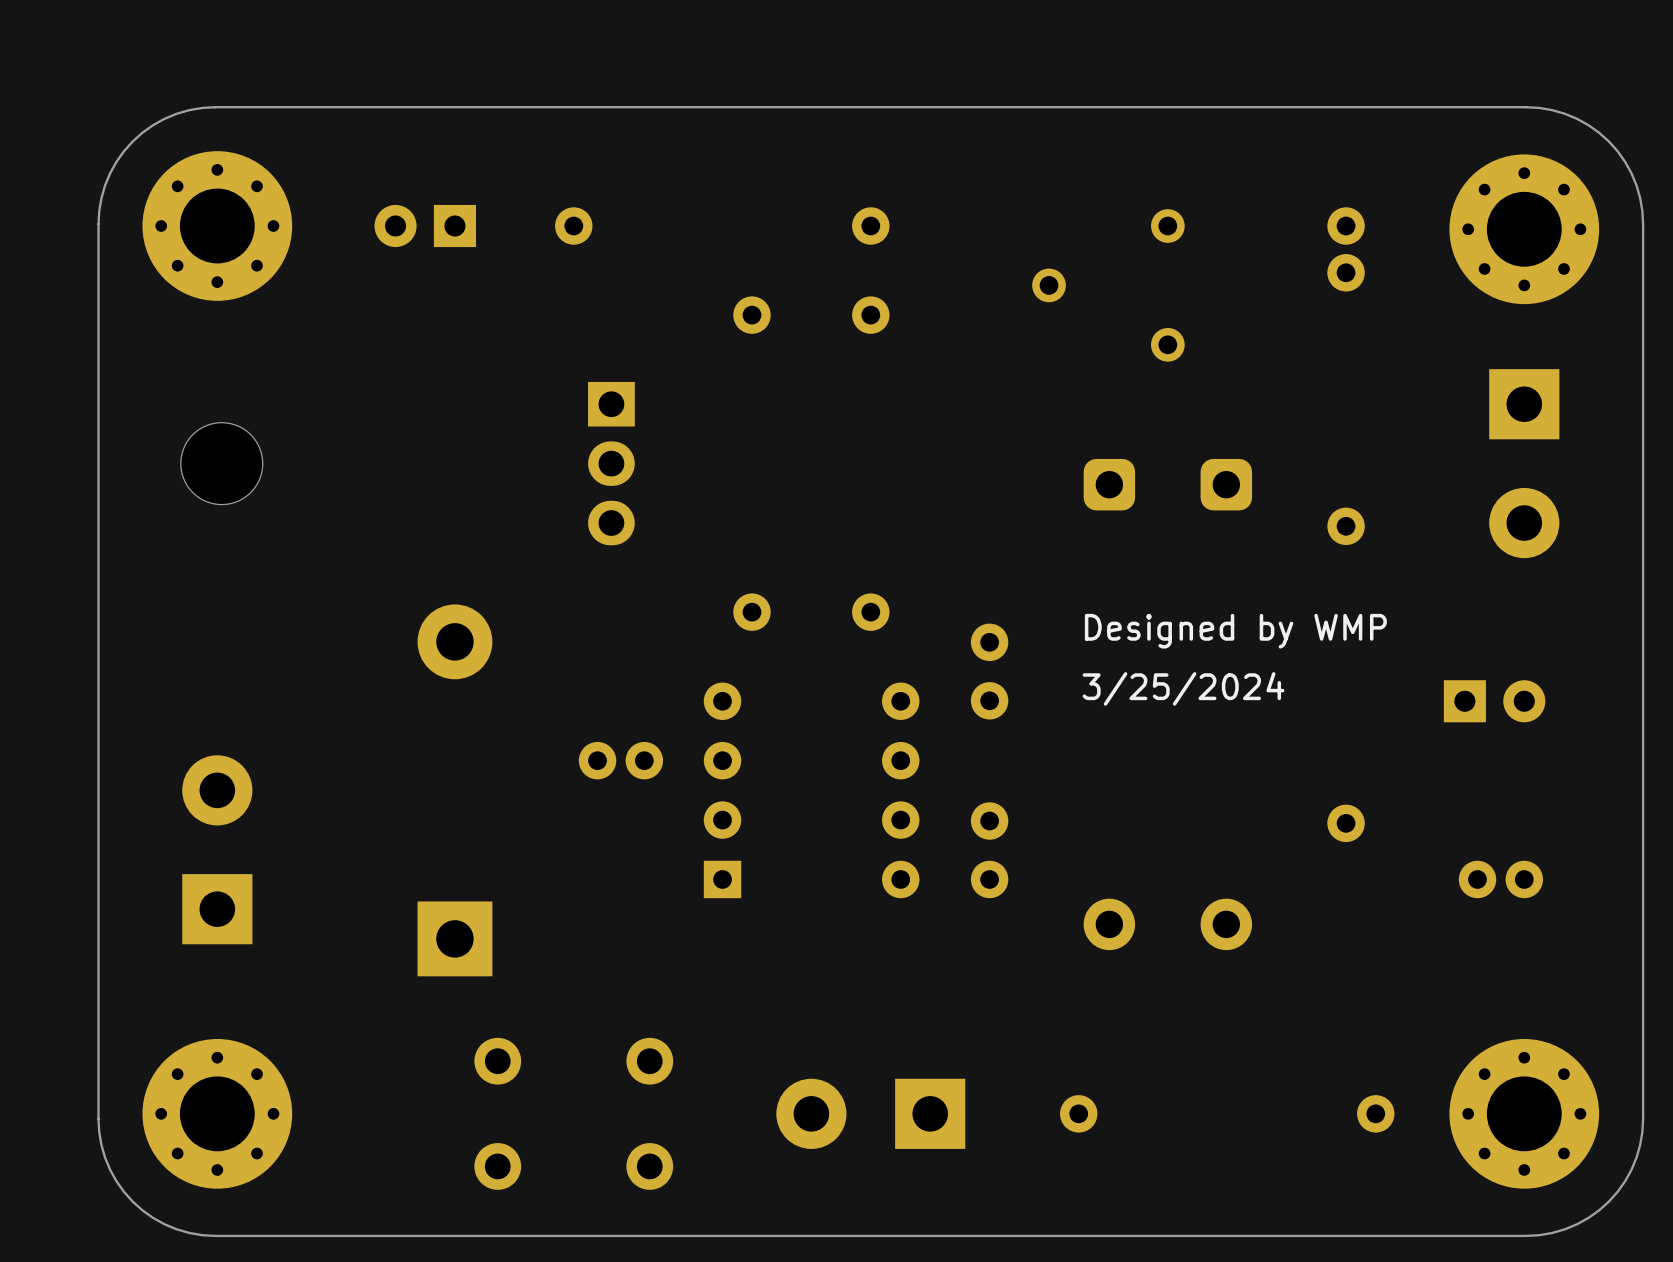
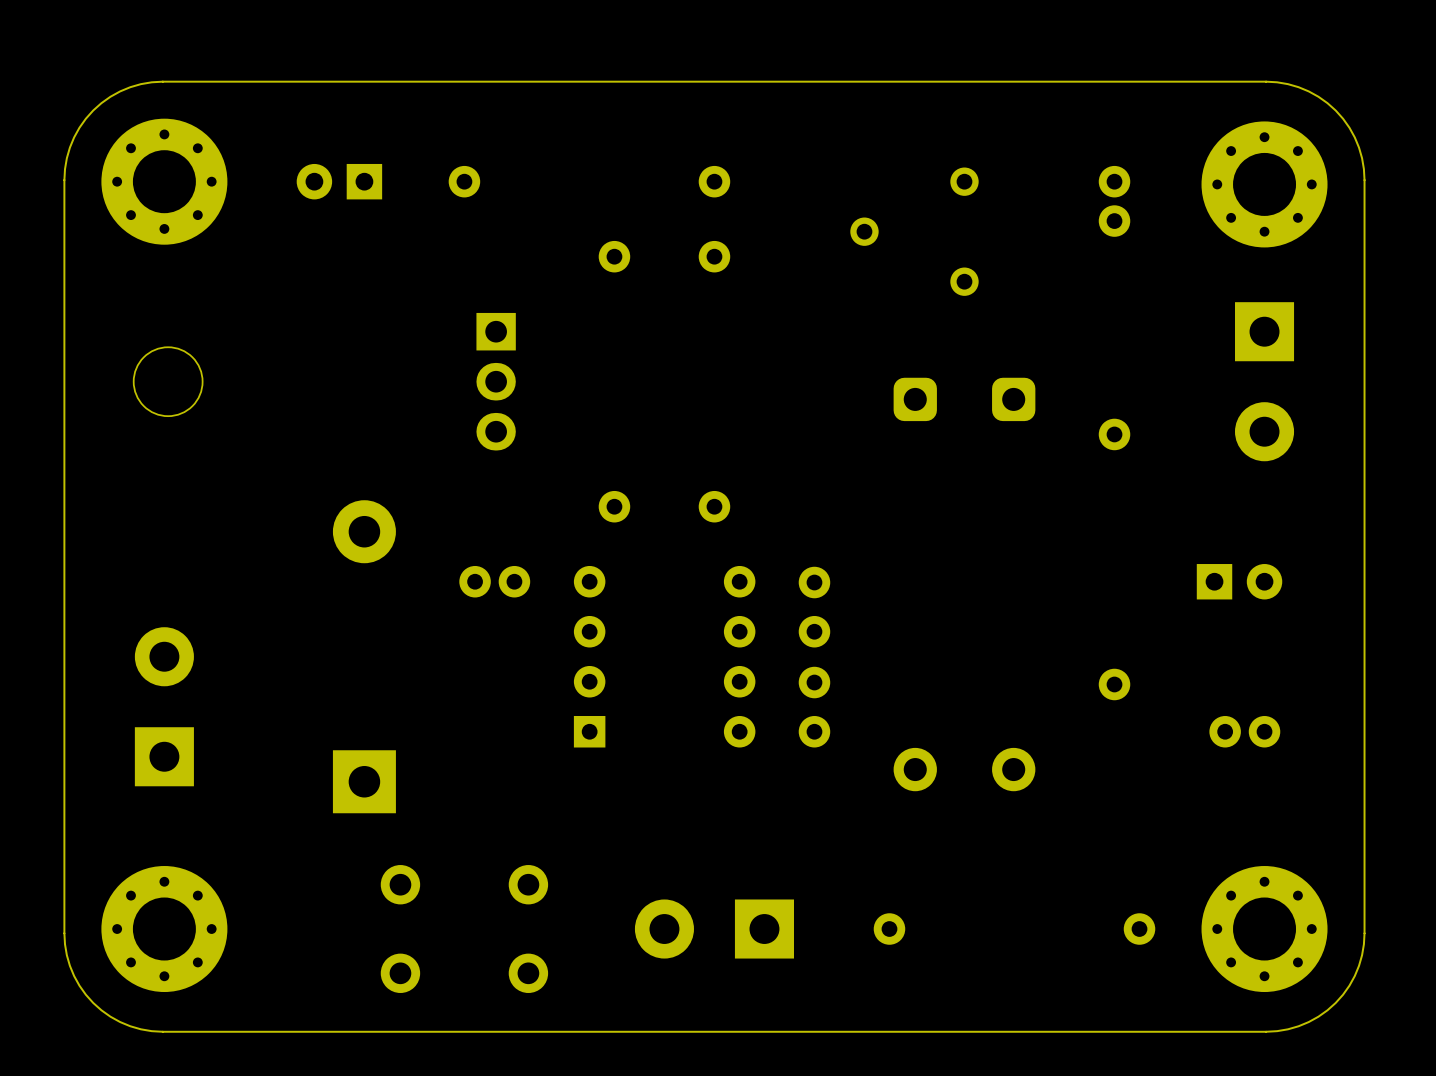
text: Designed by WMP (1235, 631) -> none
part position: (989, 671) -> (814, 607)
text: 3/25/2024 (1183, 688) -> none
part position: (620, 760) -> (494, 581)

